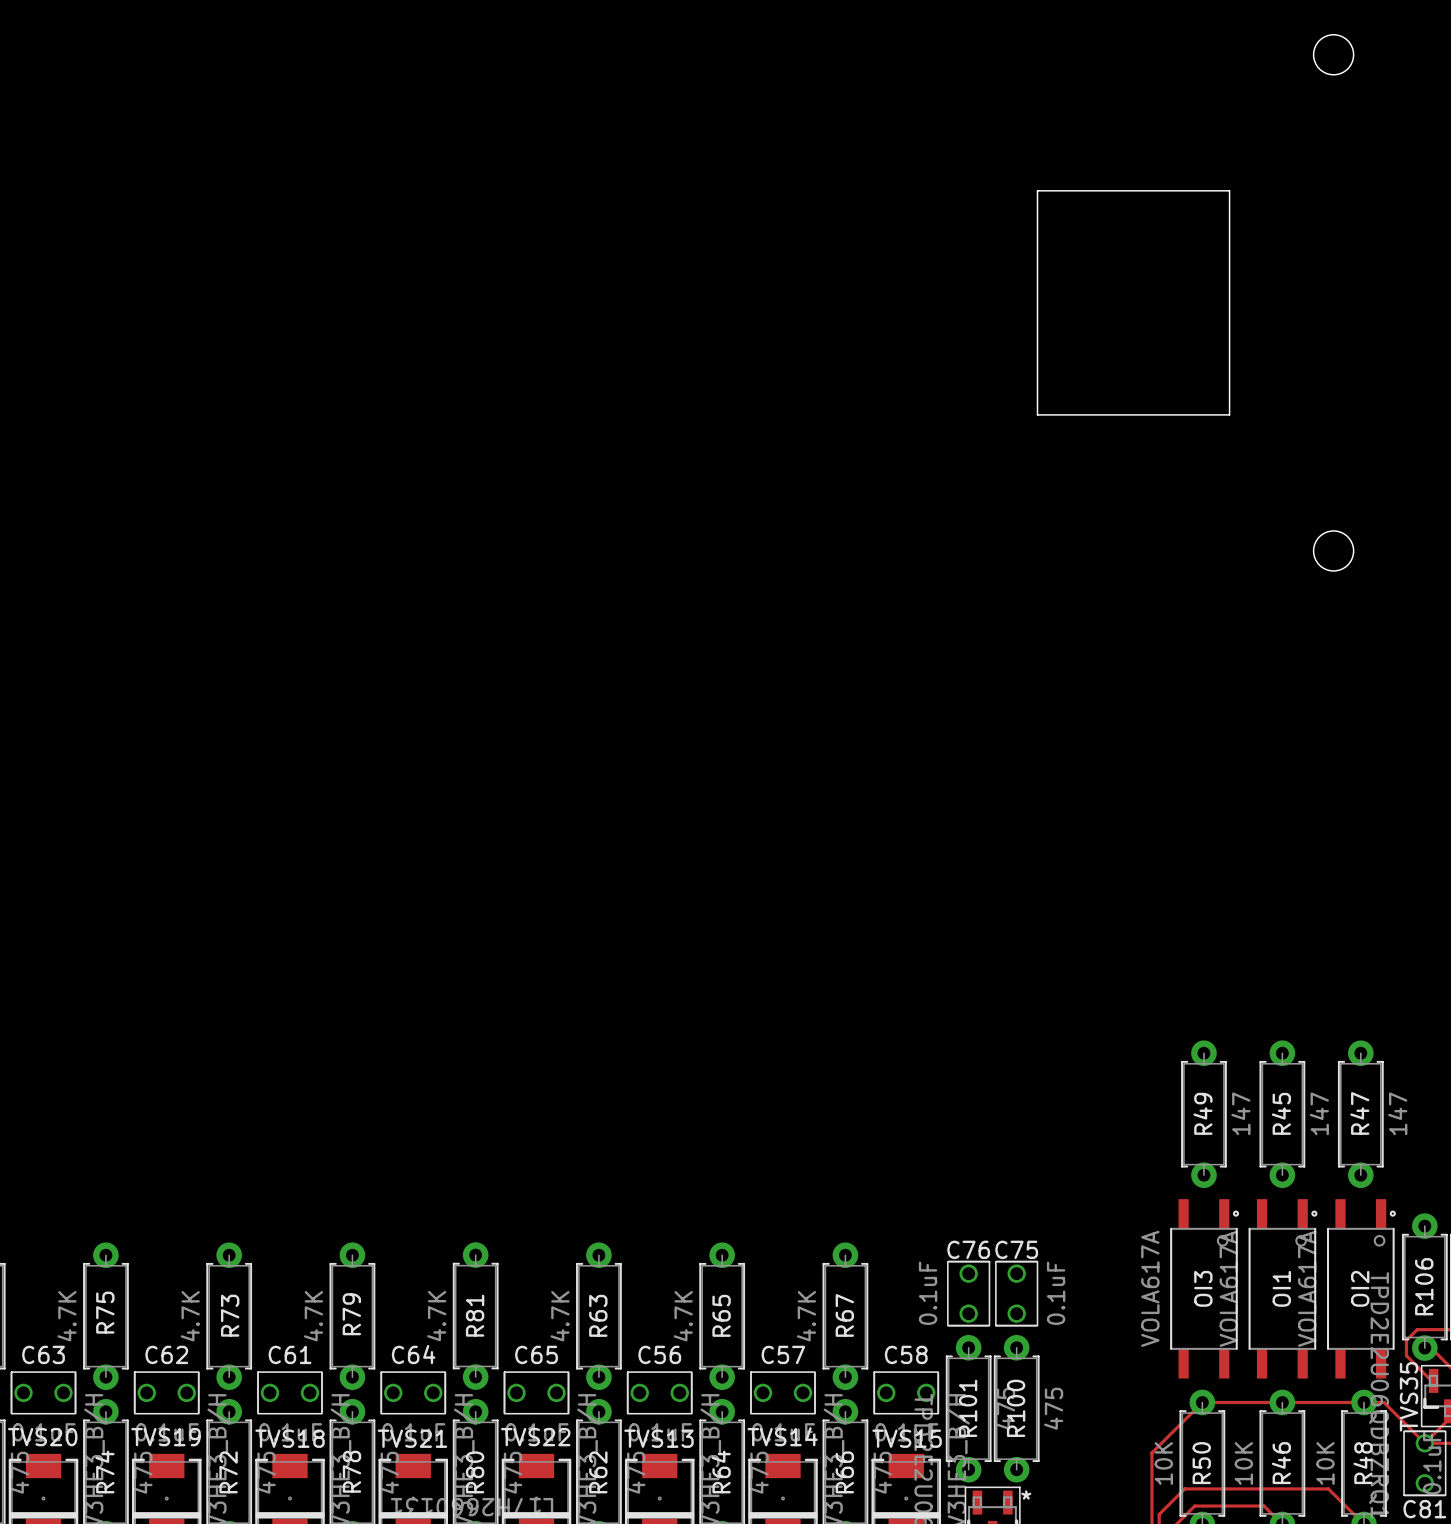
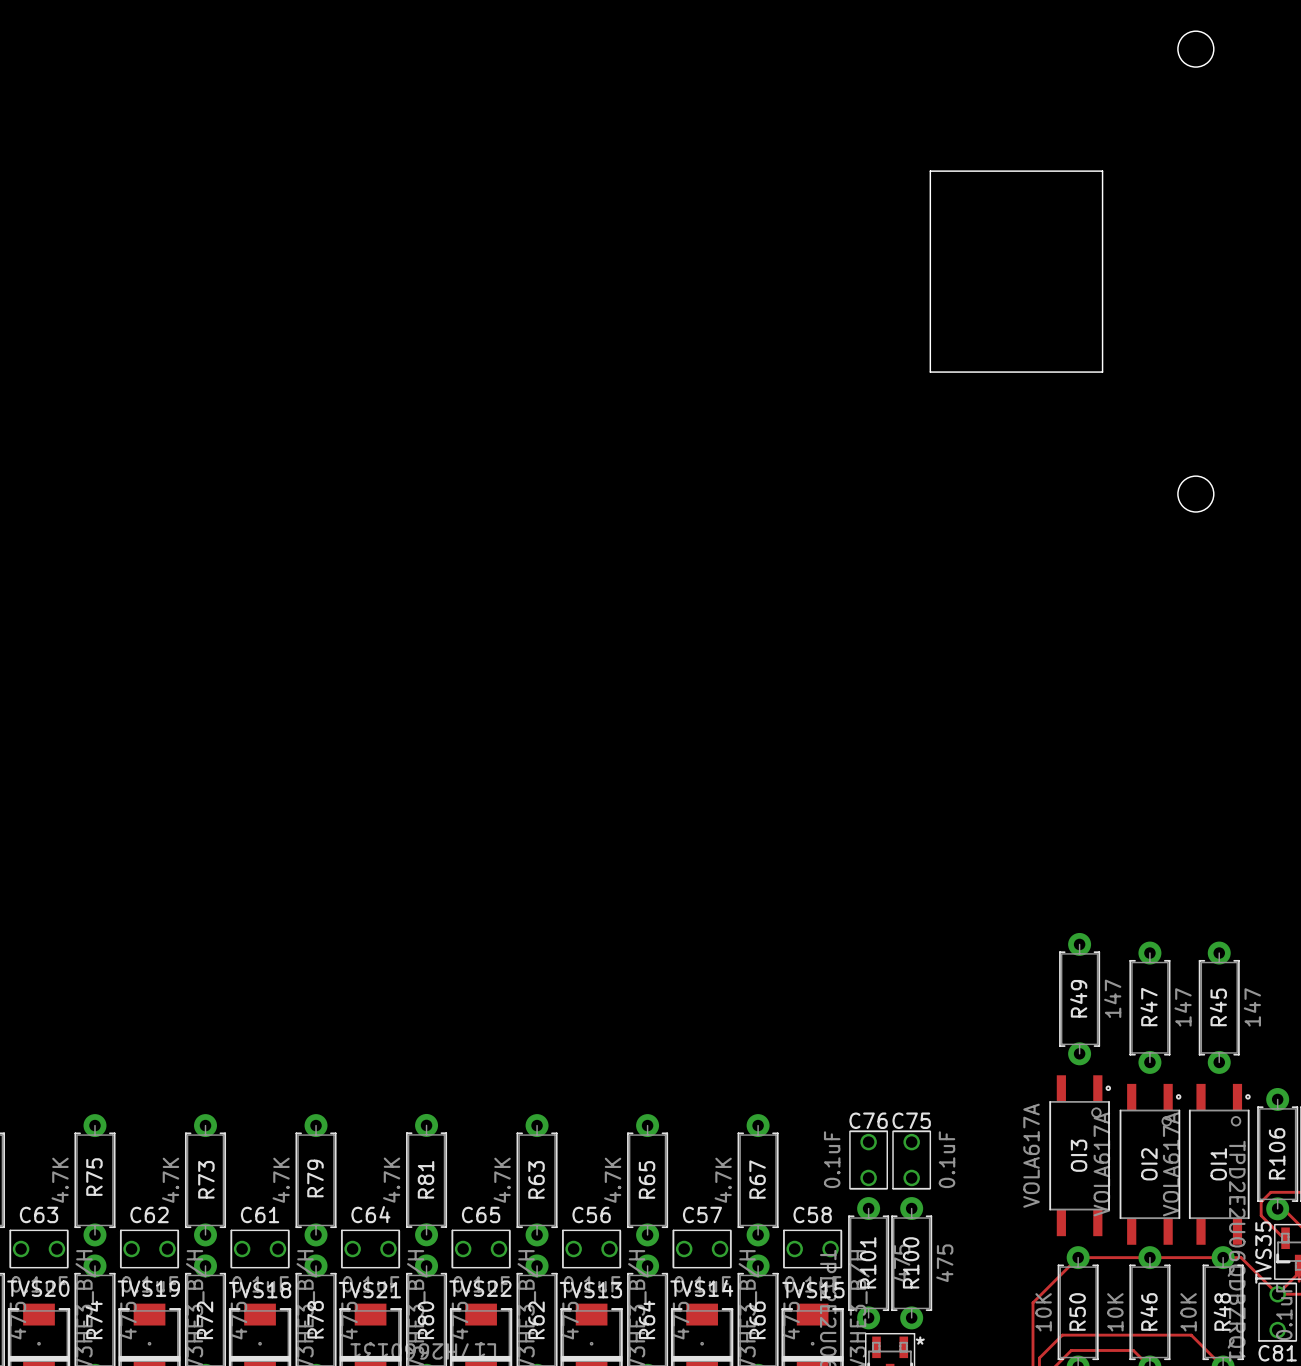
R45 position: (1282, 1114) -> (1219, 1007)
R47 position: (1360, 1114) -> (1149, 1007)
OI1 position: (1283, 1288) -> (1219, 1164)
OI2 position: (1361, 1288) -> (1150, 1164)
track: none -> (1299, 1274) (1299, 1281)

